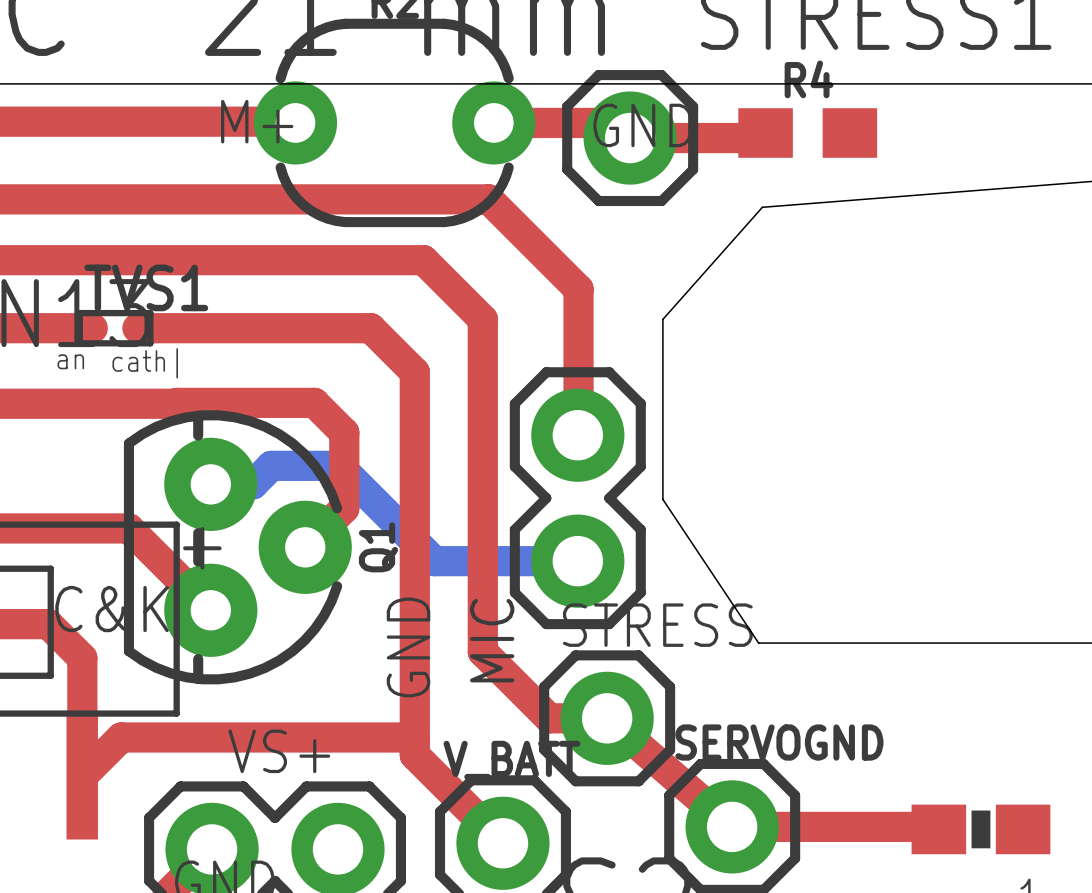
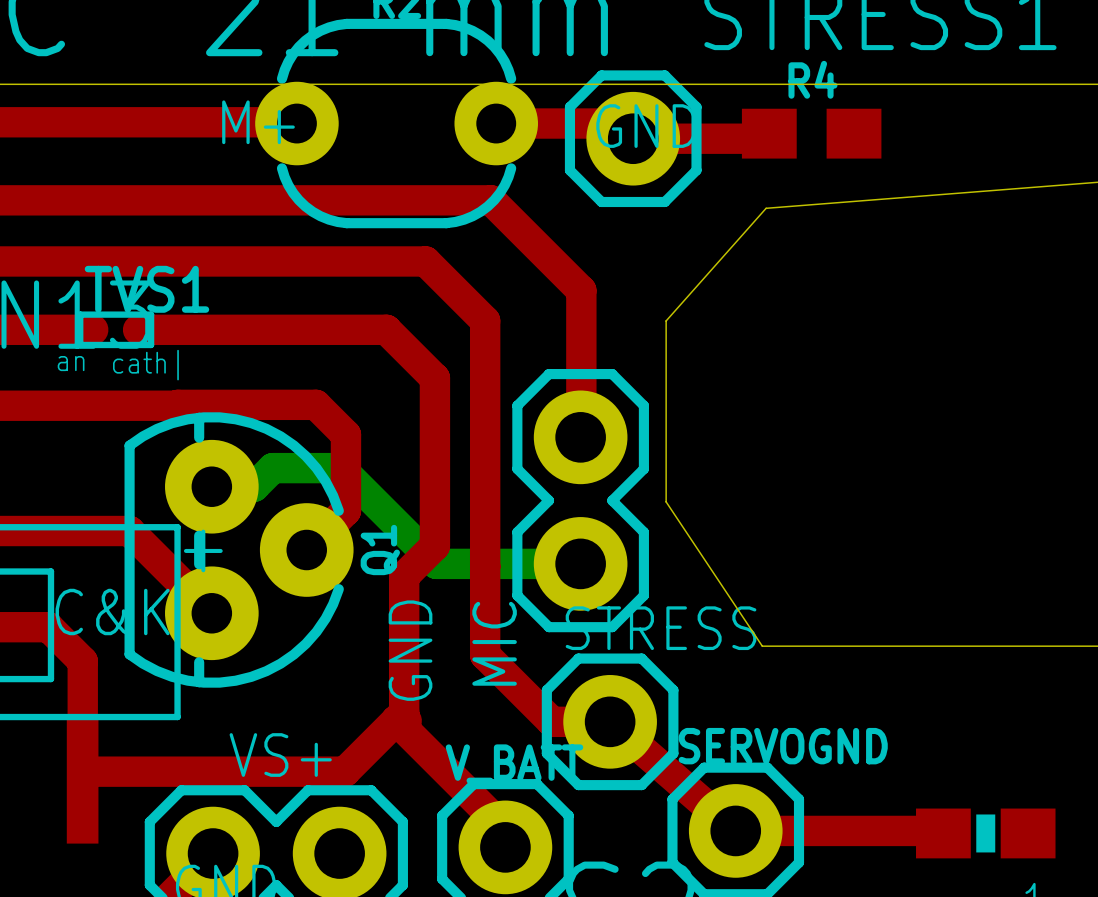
top track: (370, 328) (414, 372) (414, 755) (502, 843) -> (406, 720) (396, 720) (505, 829) (505, 847)
top track: (414, 737) (121, 737) (90, 767) -> (372, 329) (386, 329) (434, 378) (434, 545) (404, 576) (404, 712) (345, 771) (91, 771)

